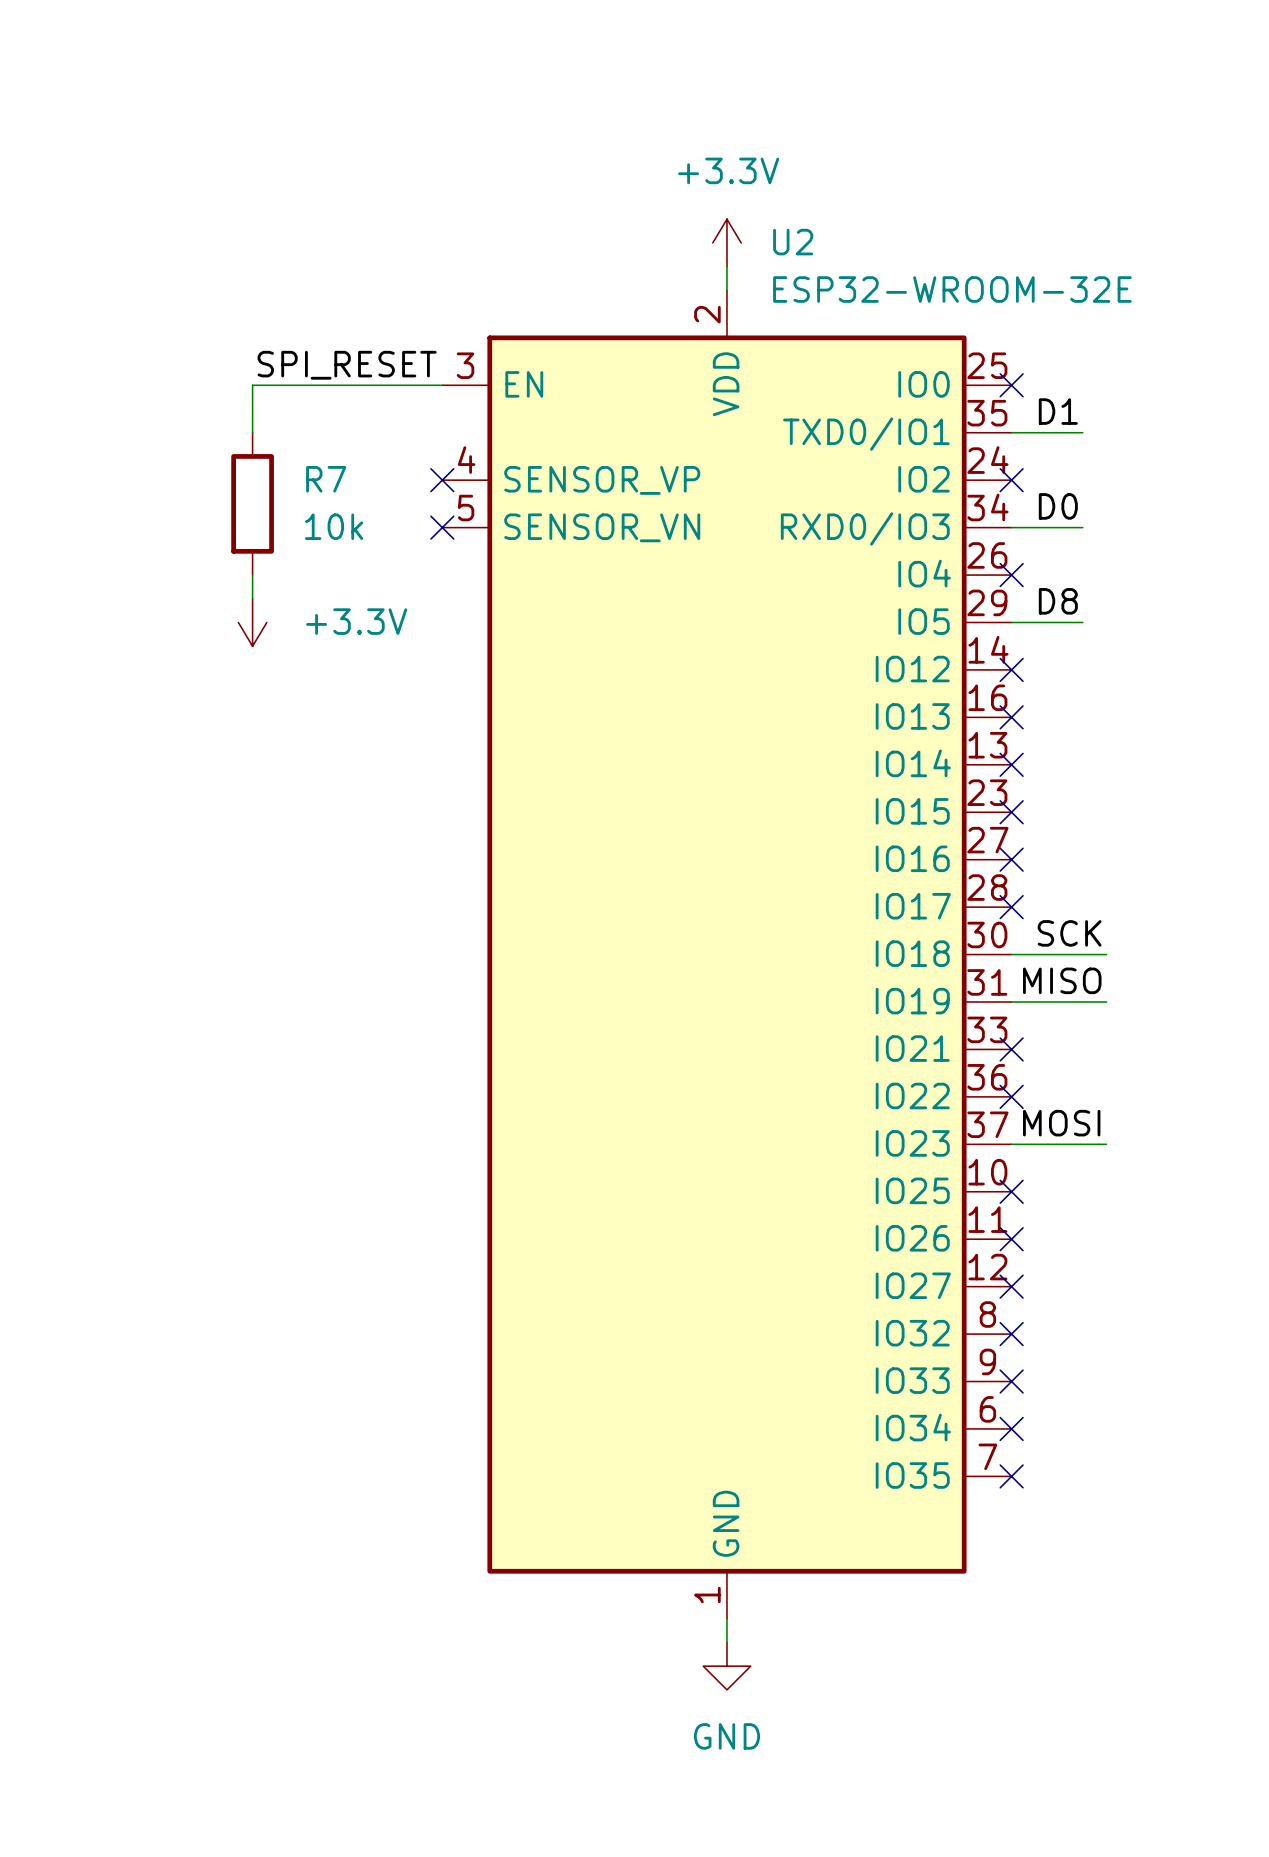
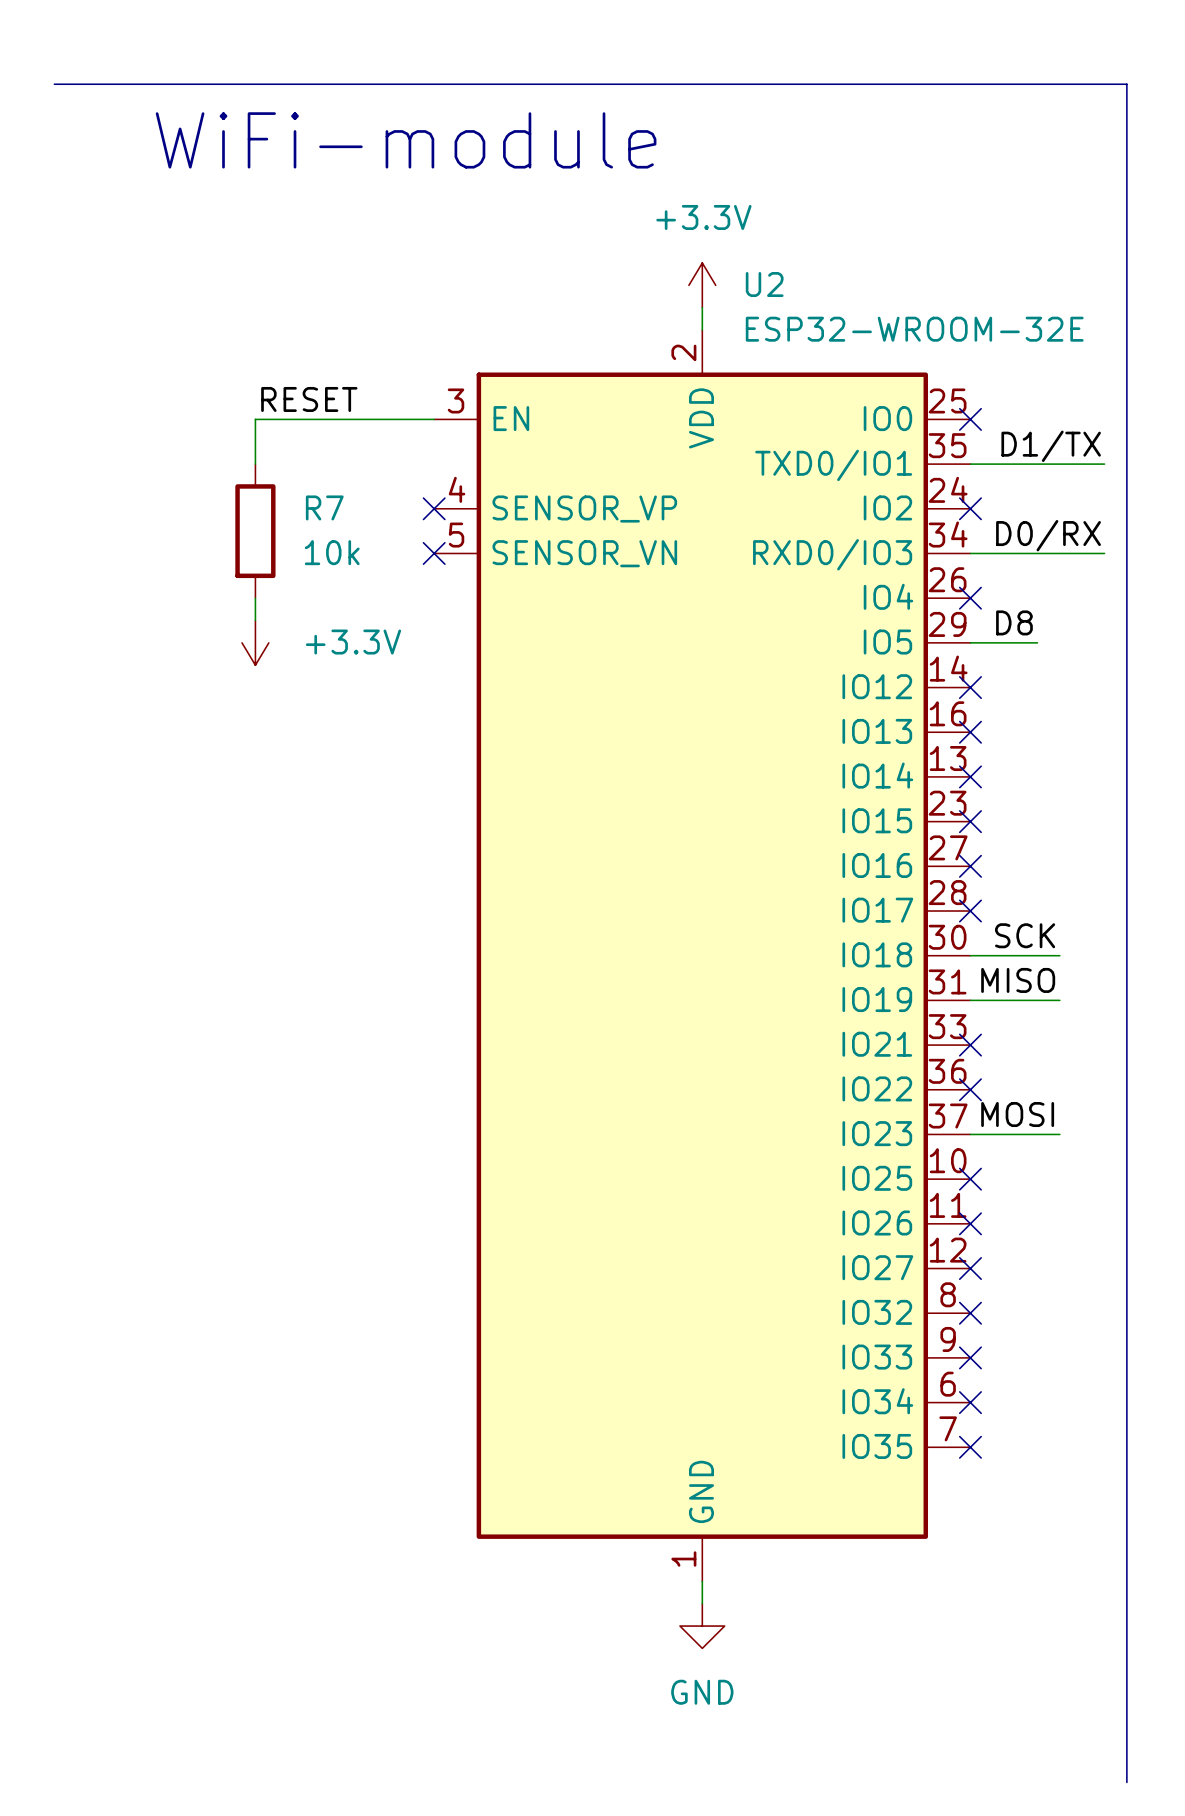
line: none -> (54, 84) (1126, 84) (1126, 1782)
text: none -> WiFi-module (406, 140)
label: SPI_RESET (347, 365) -> RESET (309, 399)
label: D1 (1058, 411) -> none
label: none -> D1/TX (1051, 446)
wire: none -> (1037, 464) (1104, 464)
label: none -> D0/RX (1048, 535)
wire: none -> (1037, 553) (1104, 553)

